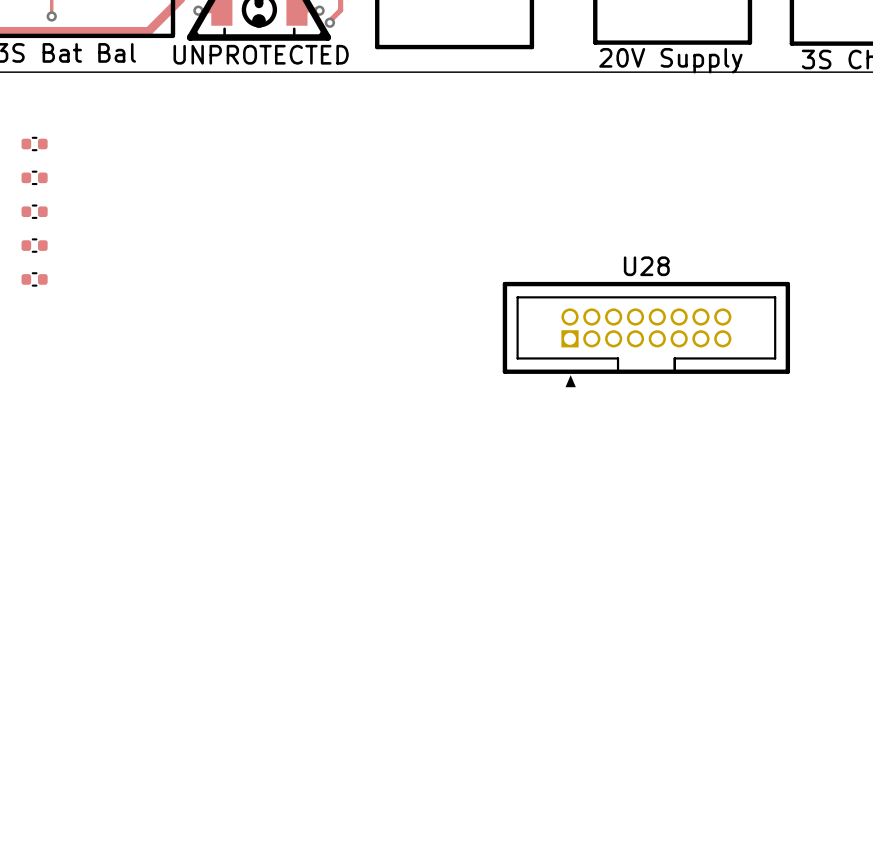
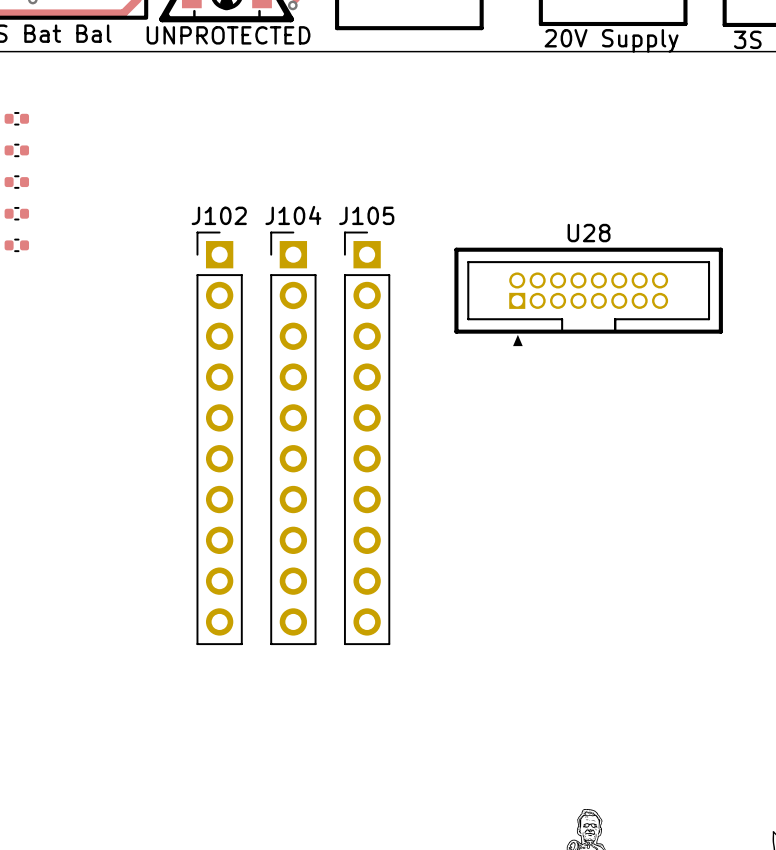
J102: none -> (219, 438)
J104: none -> (293, 438)
J105: none -> (367, 438)

